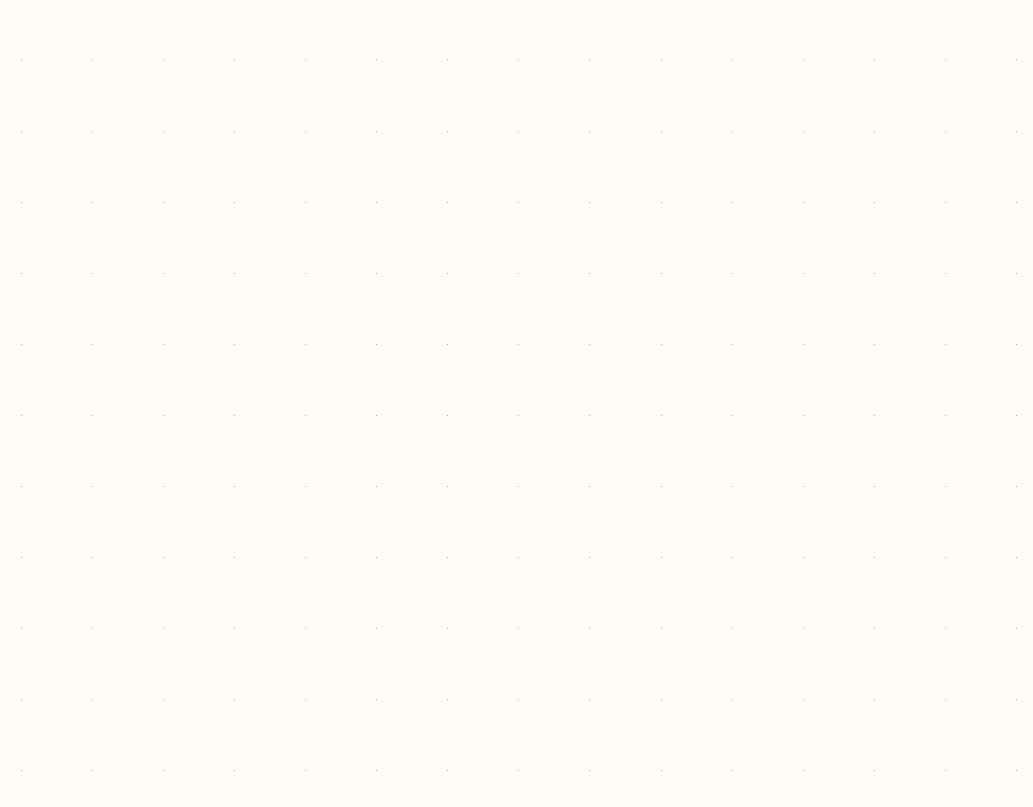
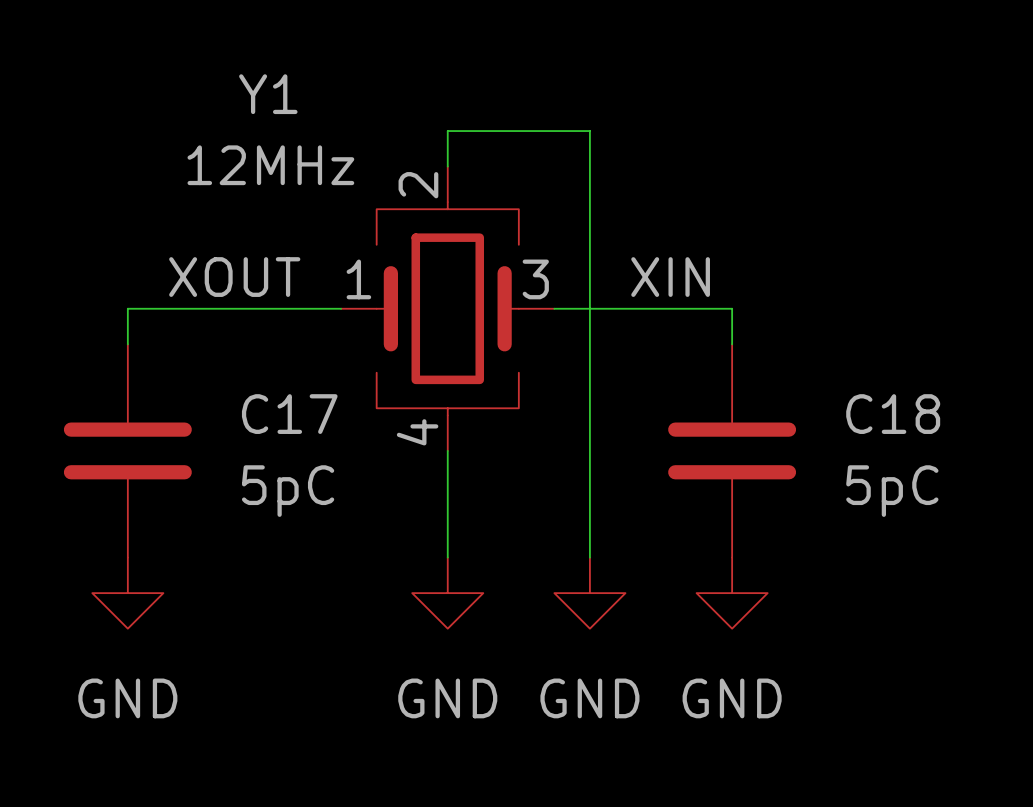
wire: none -> (447, 166) (447, 131) (589, 131) (589, 557)
label: none -> XOUT (234, 277)
label: none -> XIN (670, 277)
wire: none -> (341, 308) (127, 308) (127, 344)
Y1: none -> 12MHz (447, 308)
wire: none -> (554, 308) (732, 308) (732, 344)
C17: none -> 5pC (127, 450)
wire: none -> (447, 450) (447, 557)
C18: none -> 5pC (732, 450)
power symbol: none -> GND (127, 593)
power symbol: none -> GND (447, 593)
power symbol: none -> GND (589, 593)
power symbol: none -> GND (732, 593)

